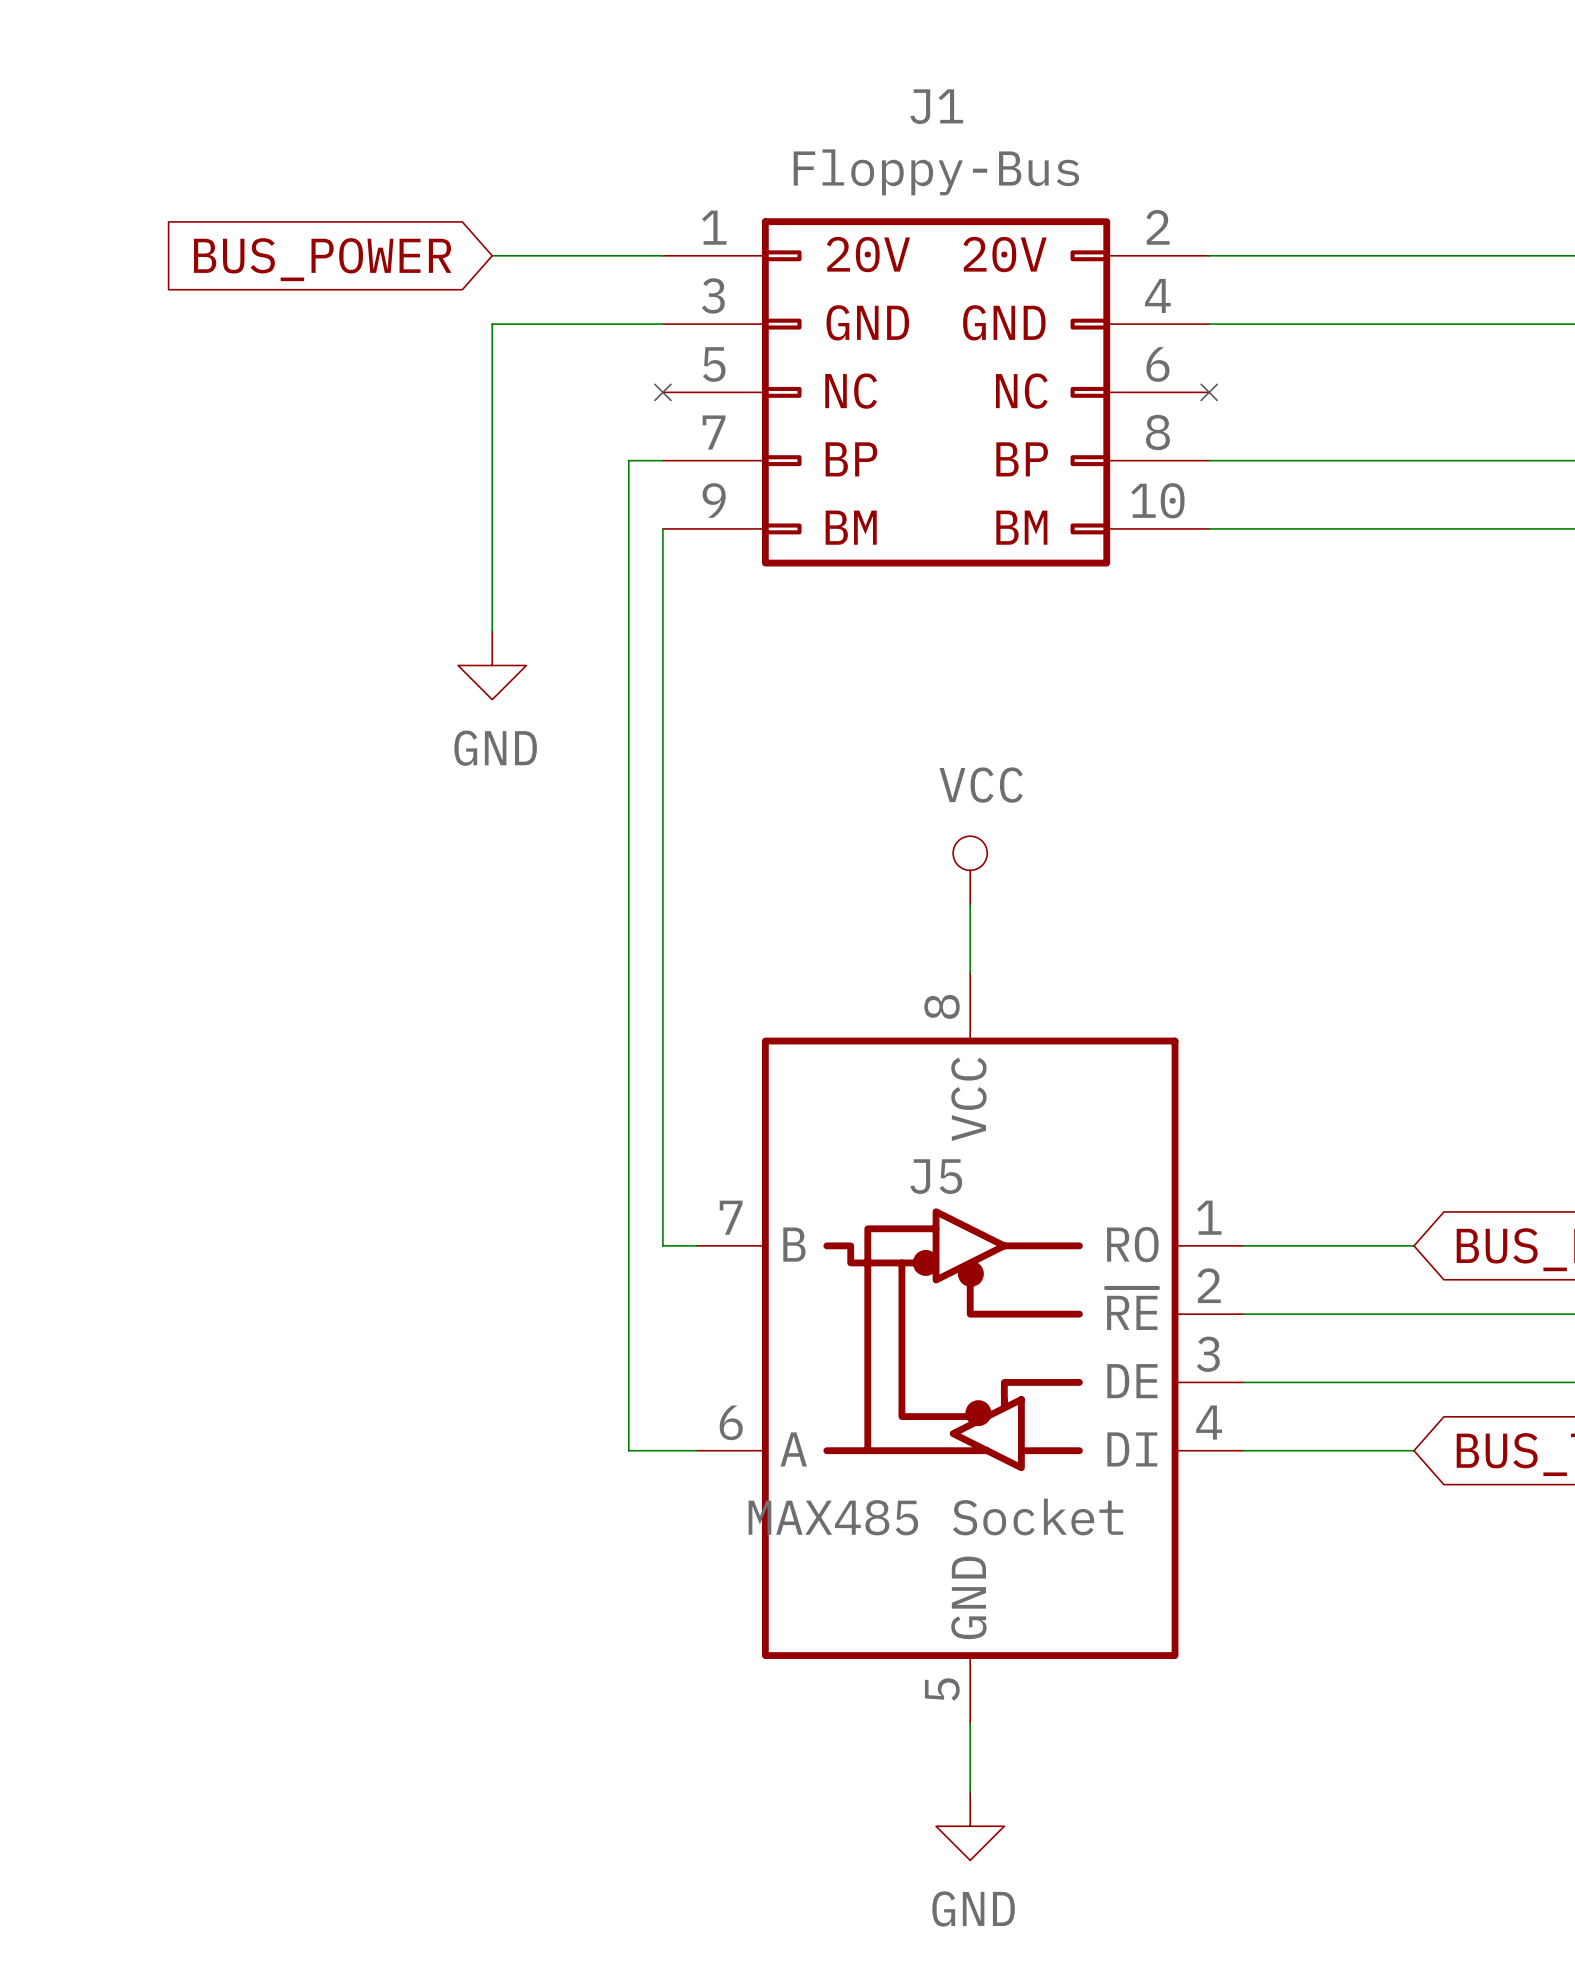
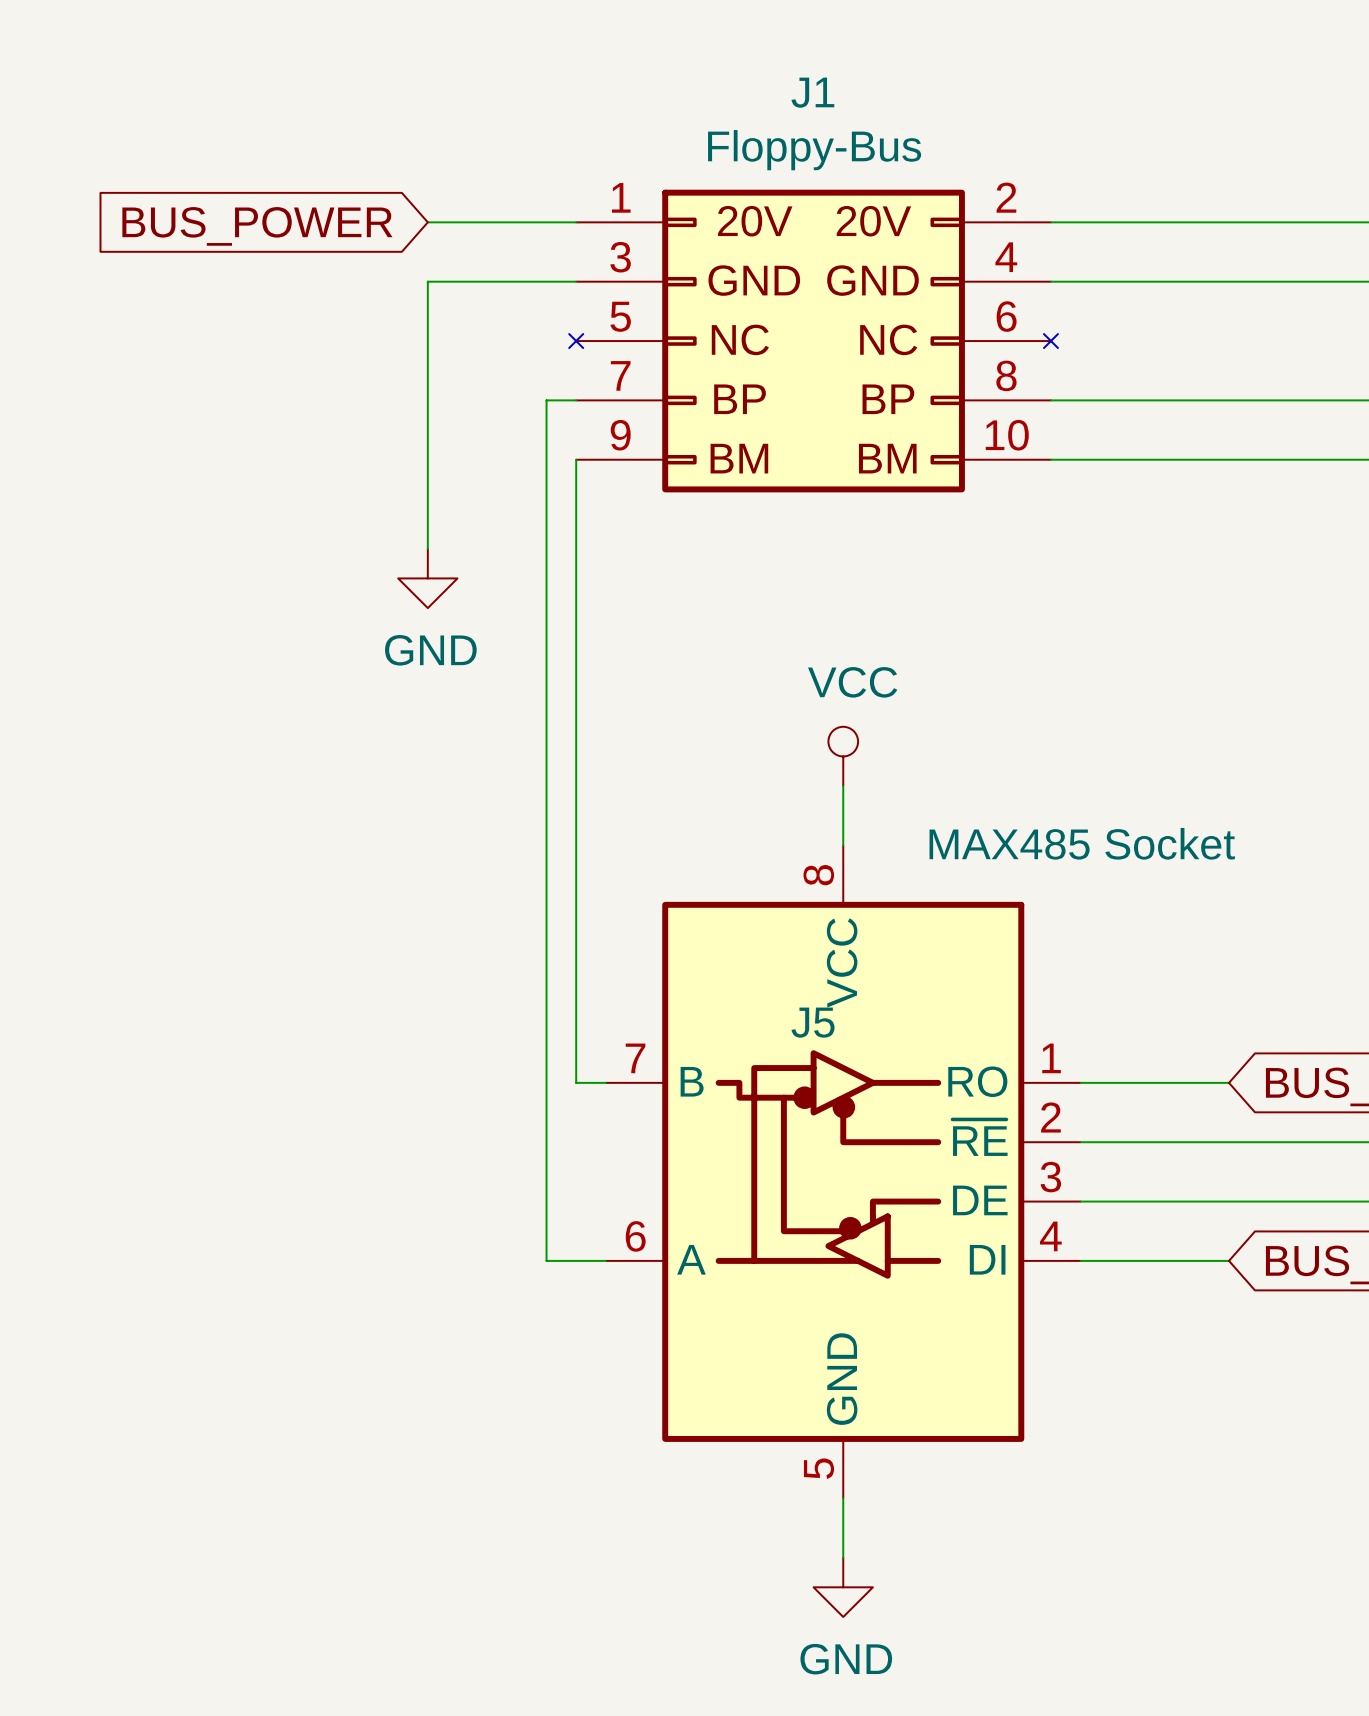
J5 value position: MAX485 Socket (935, 1516) -> MAX485 Socket (1082, 843)

